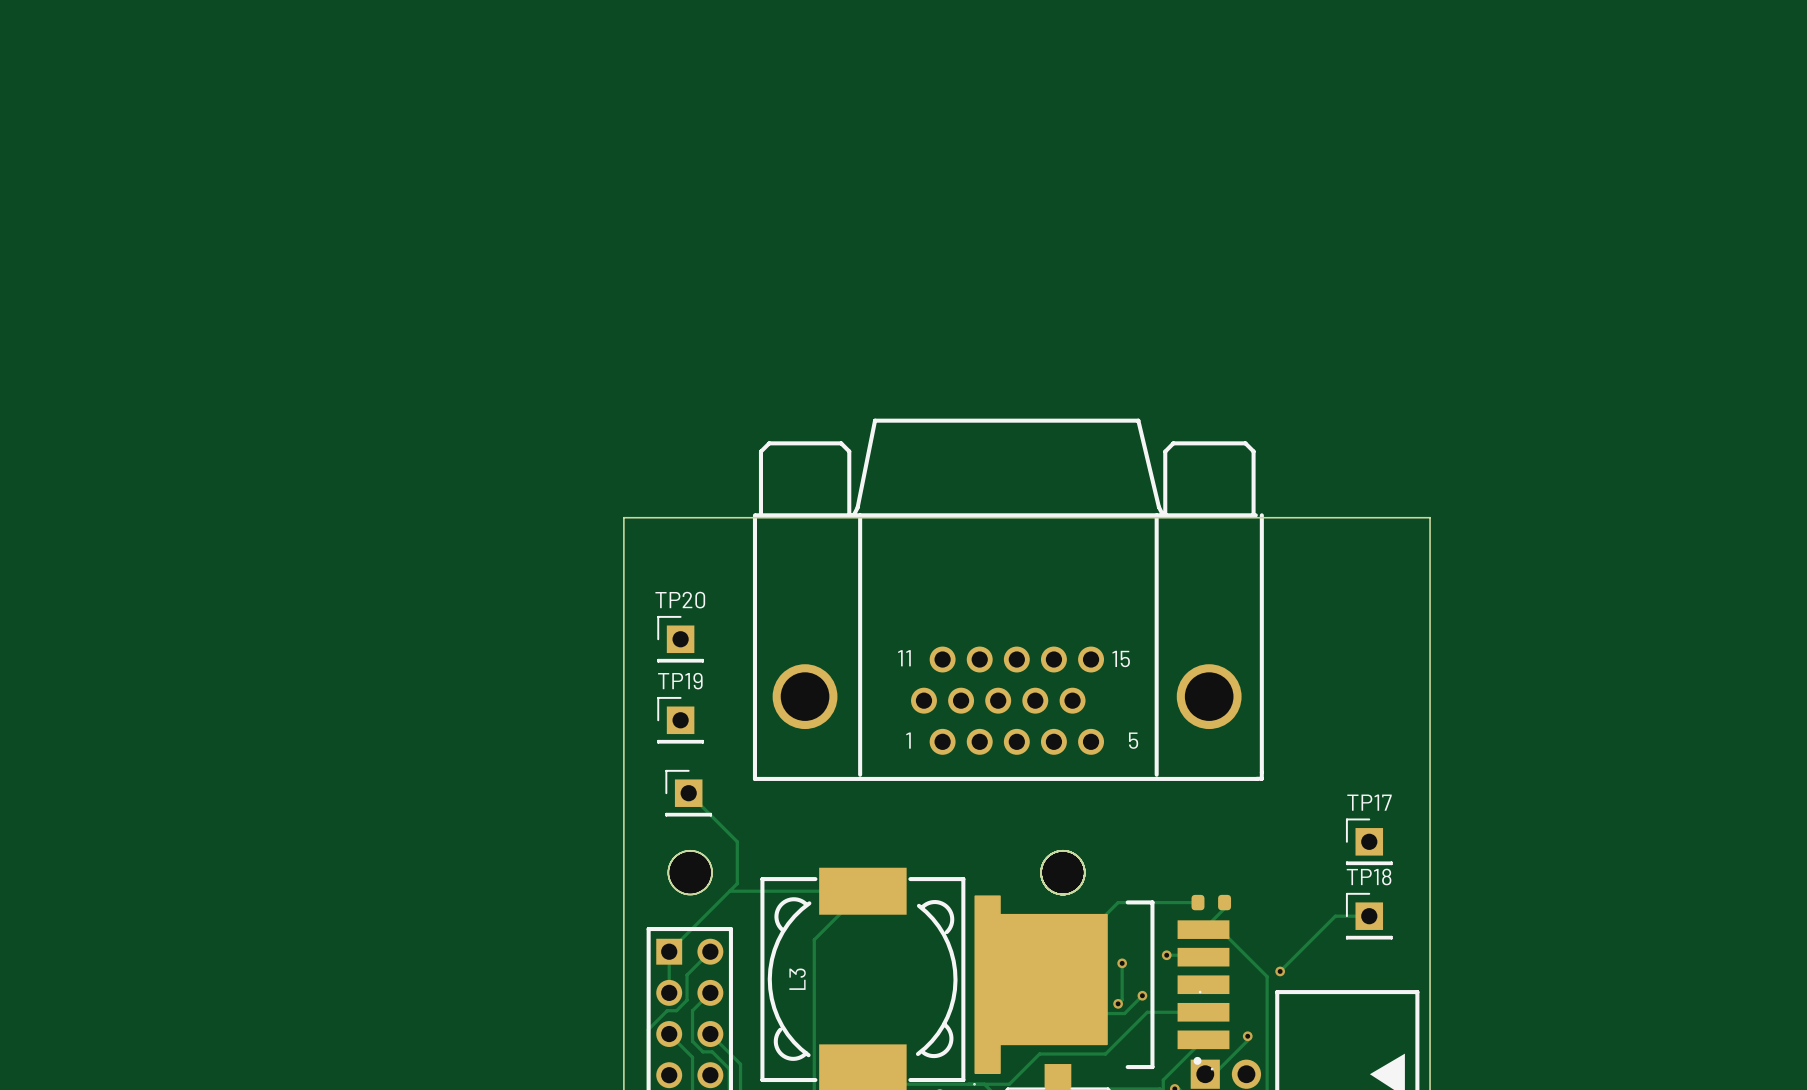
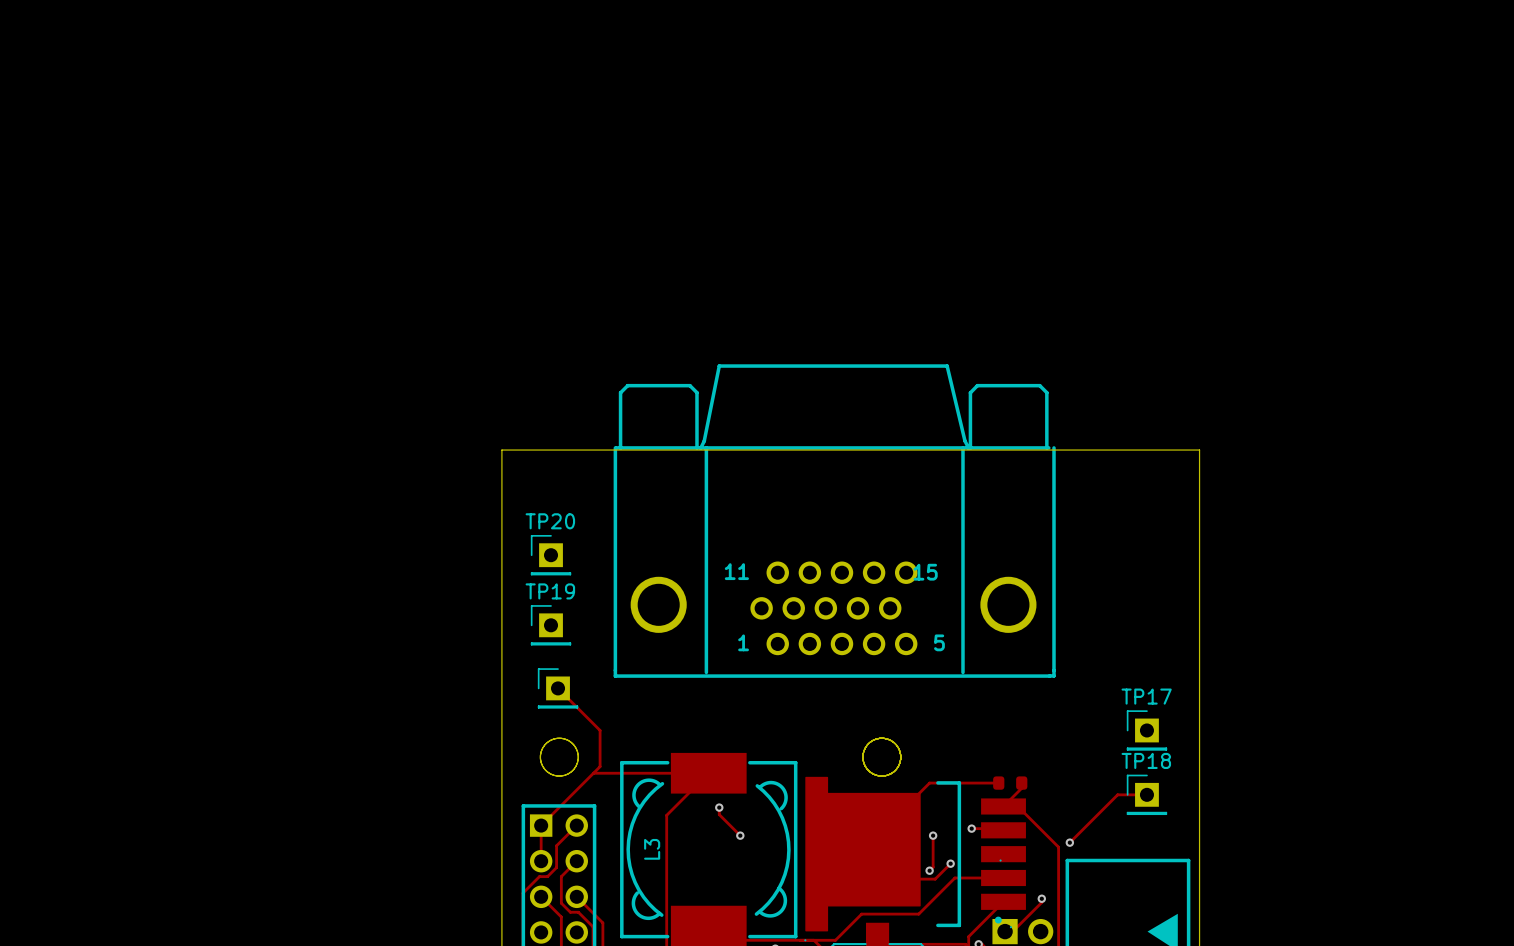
track: none -> (719, 807) (719, 814) (740, 835)
via: none -> (719, 807)
via: none -> (740, 835)

